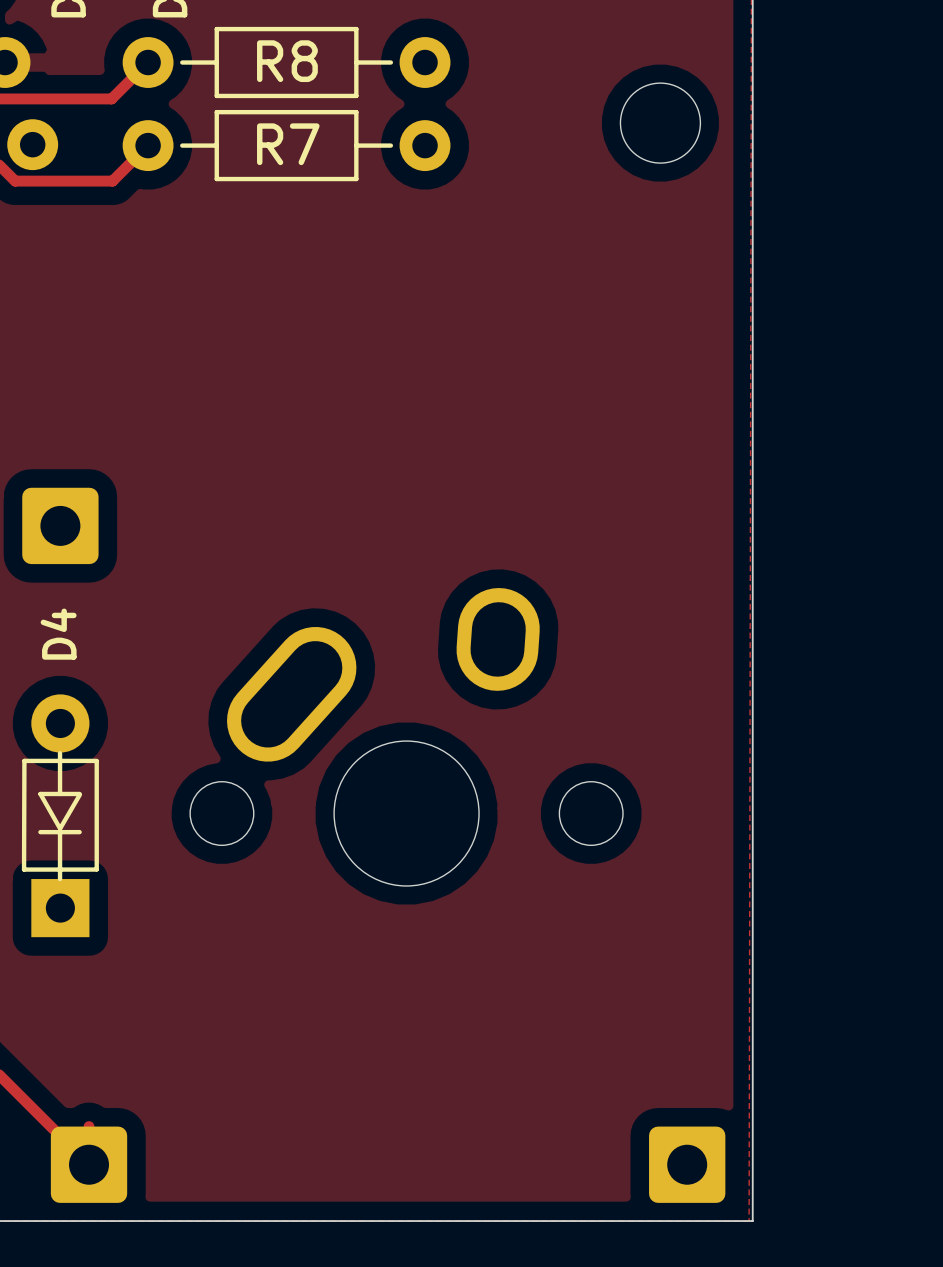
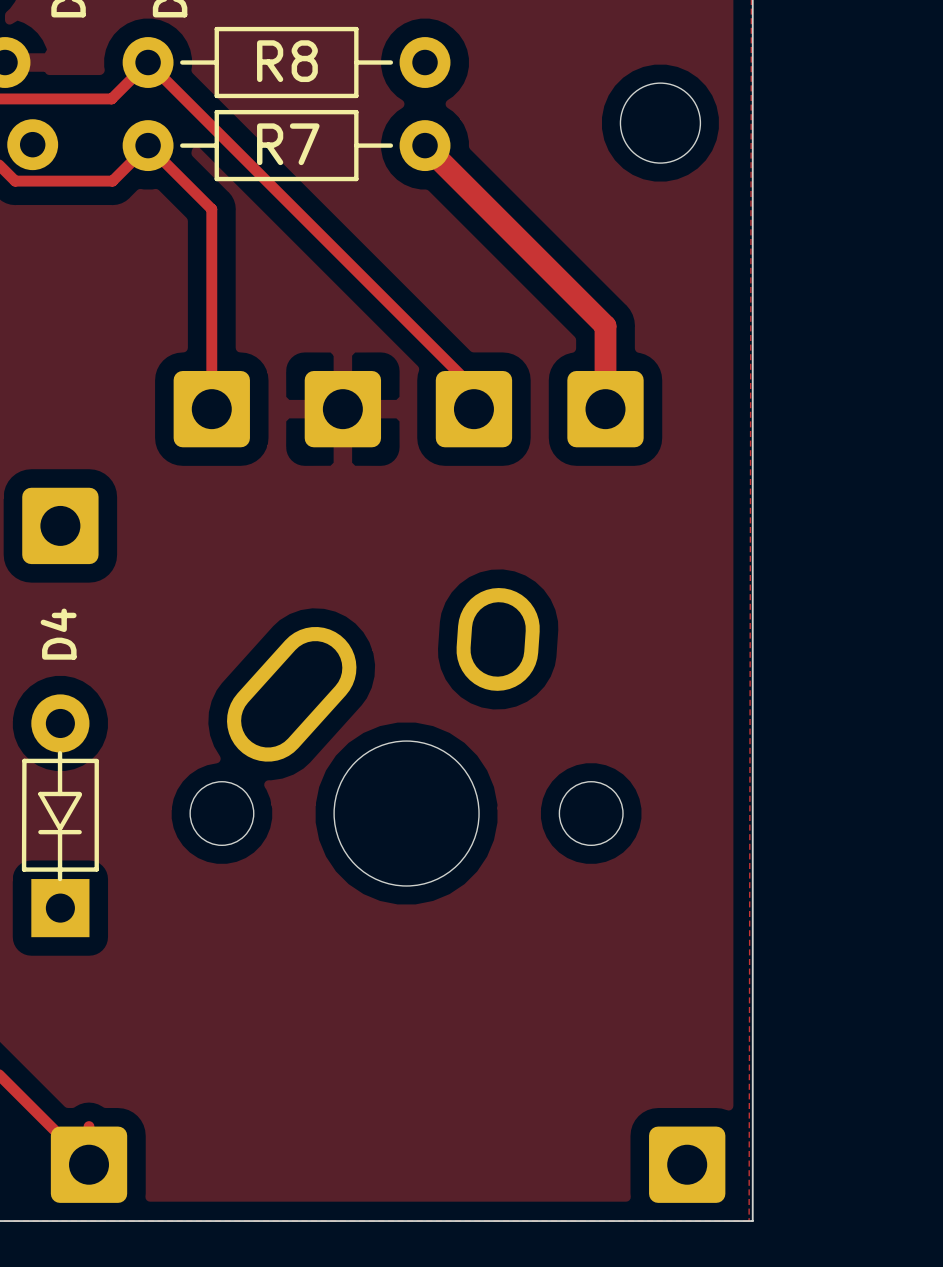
track: none -> (148, 62) (473, 388) (473, 409)
track: none -> (148, 145) (211, 209) (211, 409)
track: none -> (425, 145) (605, 326) (605, 409)
part: none -> (211, 409)
part: none -> (342, 409)
part: none -> (473, 409)
part: none -> (605, 409)

